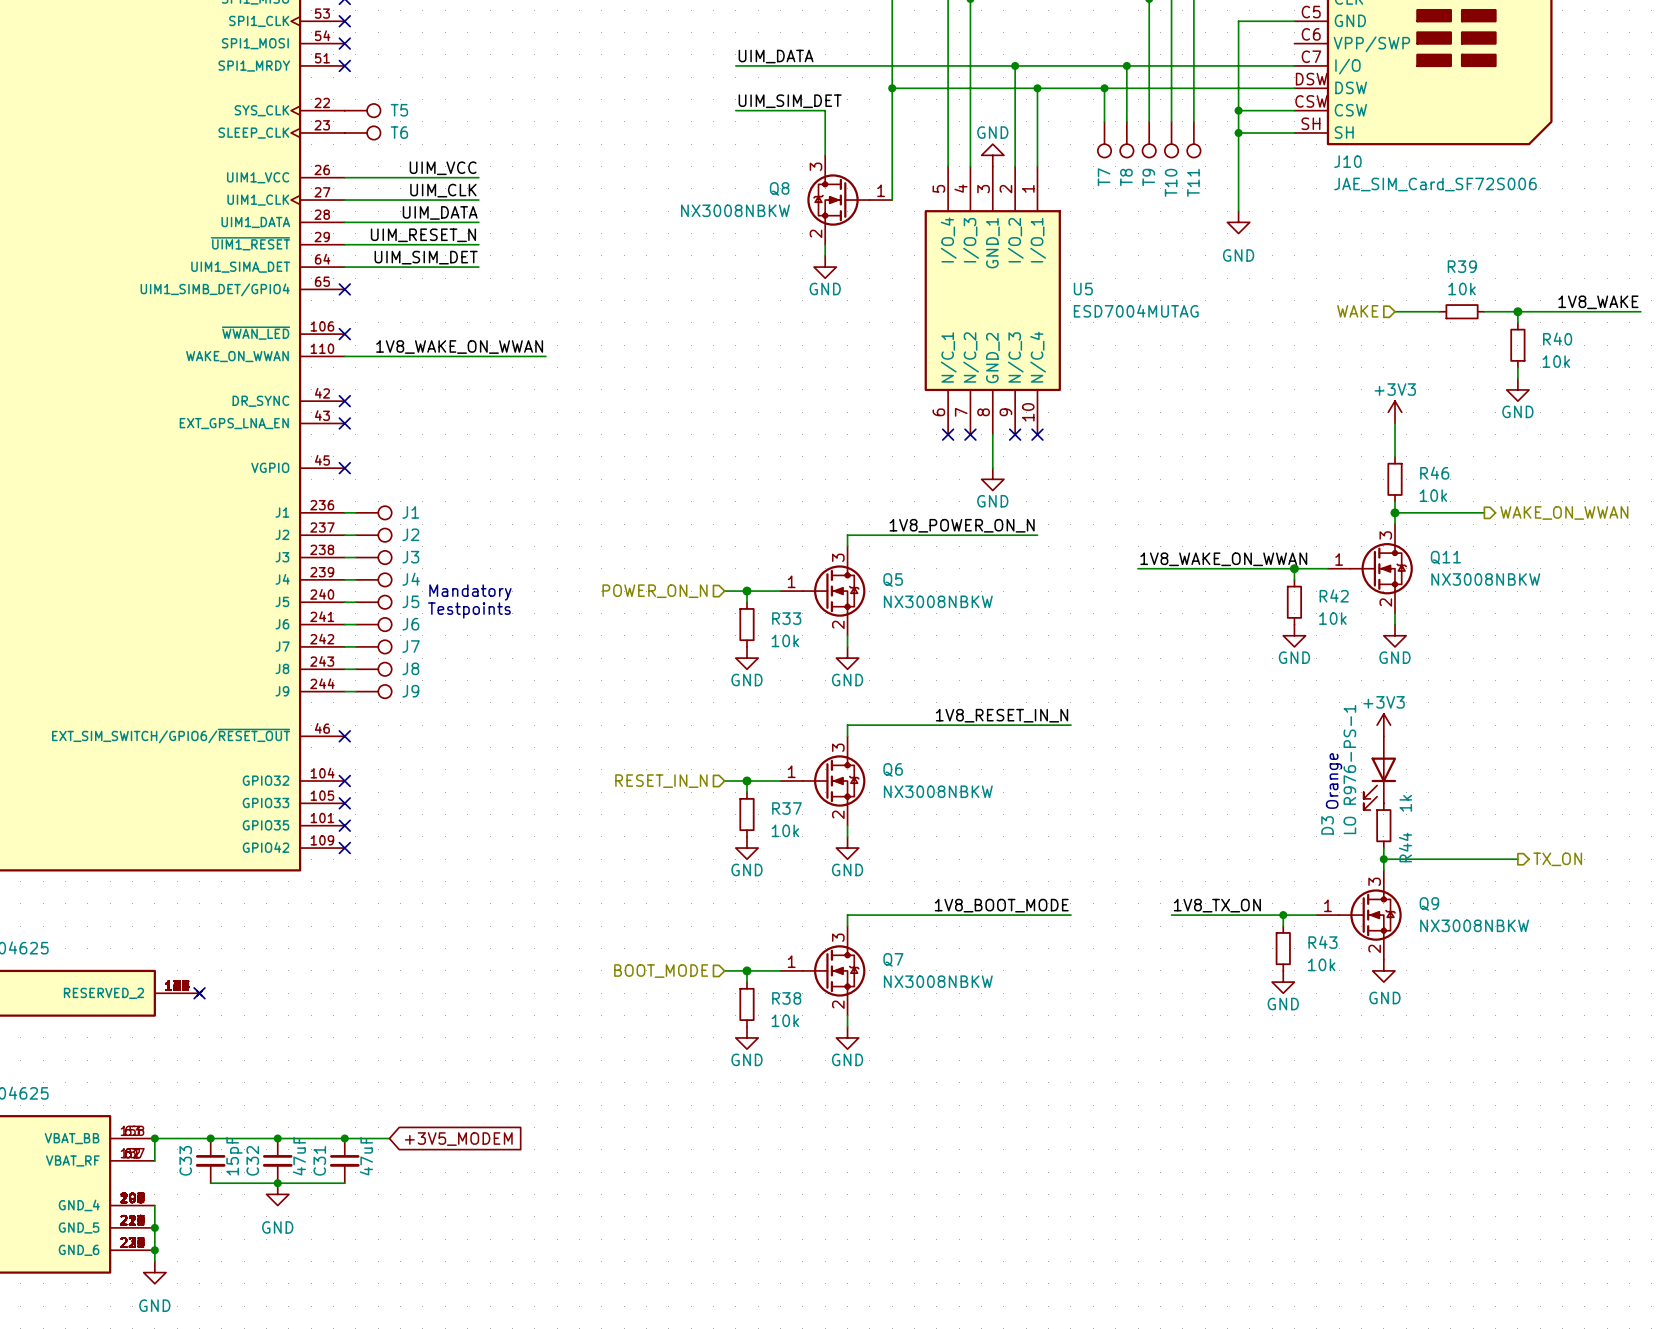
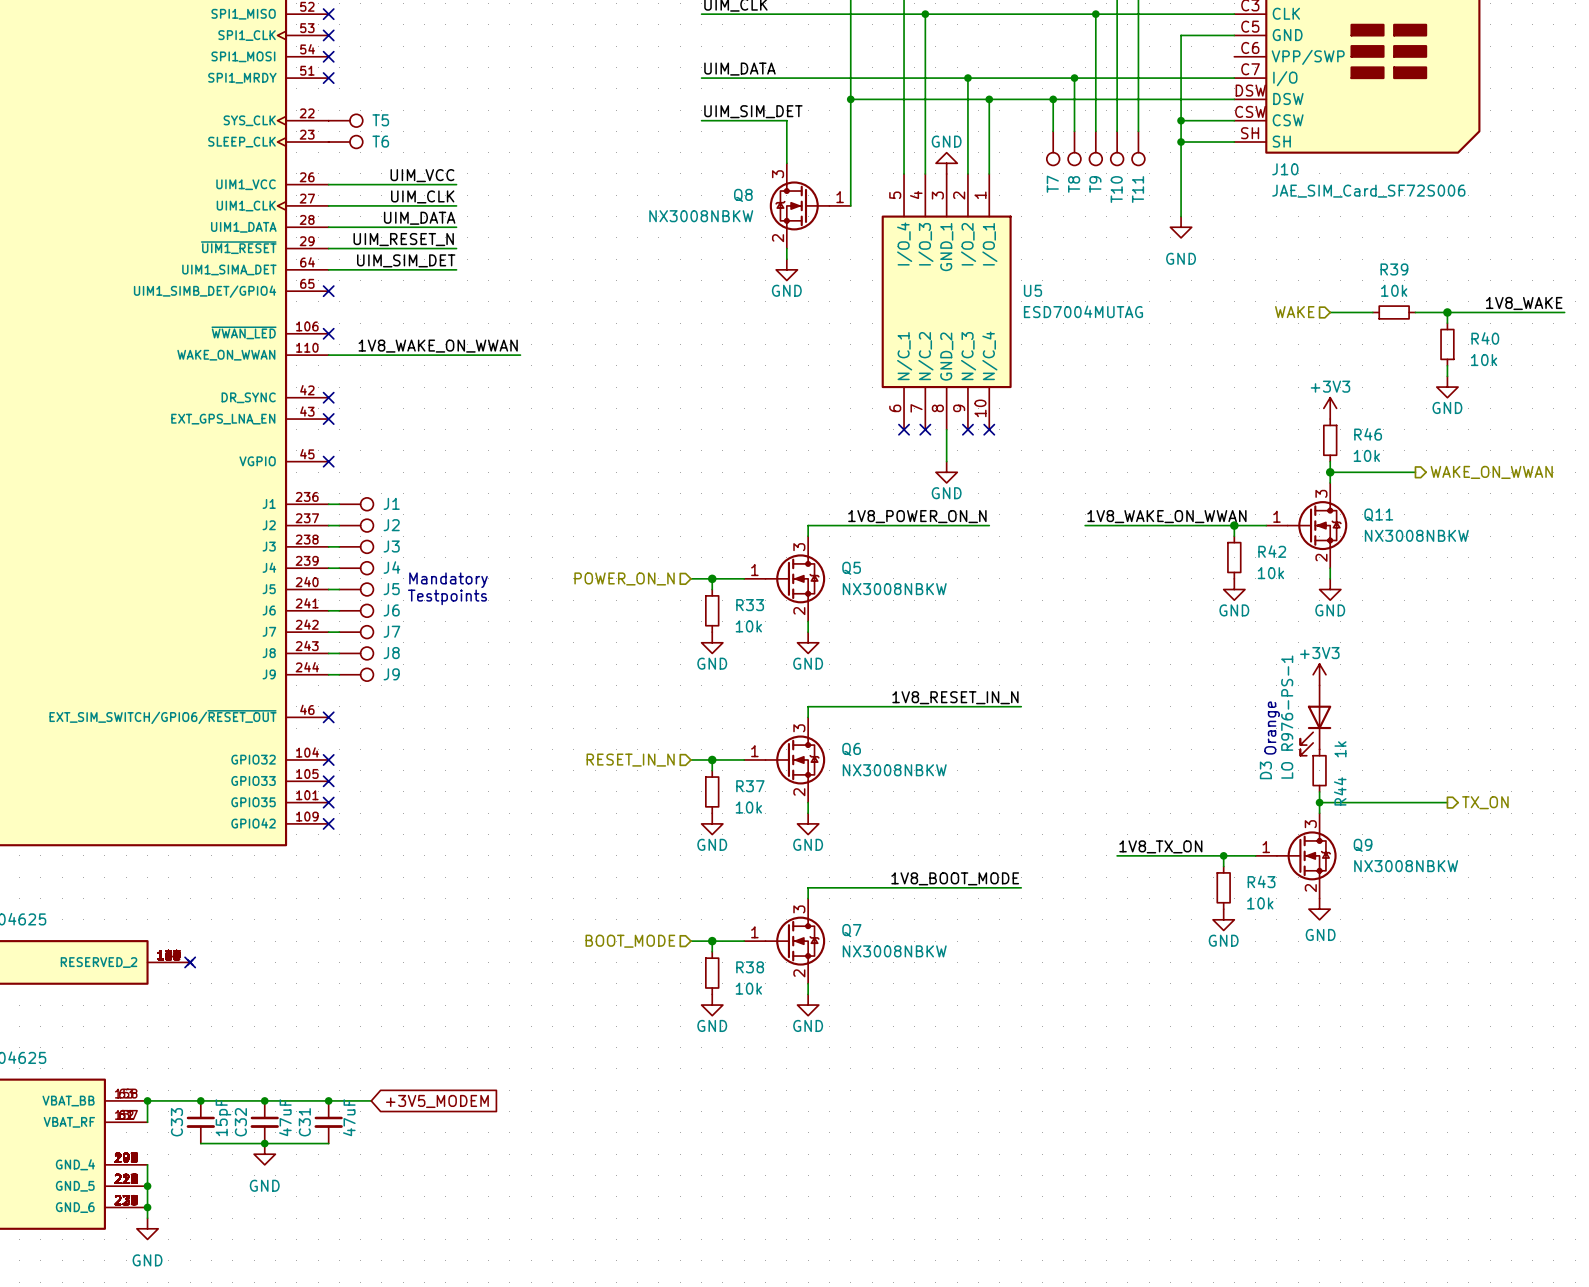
wire: (1395, 423) (1395, 456) -> none
R46 position: (1395, 479) -> (1330, 440)
wire: (1395, 512) (1484, 512) -> (1330, 472) (1415, 472)
junction position: (1395, 512) -> (1330, 472)
hierarchical label position: WAKE_ON_WWAN (1564, 512) -> WAKE_ON_WWAN (1491, 472)
label position: 1V8_WAKE_ON_WWAN (1223, 559) -> 1V8_WAKE_ON_WWAN (1166, 516)
wire: (1138, 568) (1327, 568) -> (1085, 525) (1266, 525)
wire: (1294, 568) (1294, 579) -> (1234, 525) (1234, 536)
junction position: (1294, 568) -> (1234, 525)
Q11 position: (1370, 568) -> (1306, 525)
R42 position: (1294, 602) -> (1234, 557)
power symbol position: GND (1294, 635) -> GND (1234, 589)
power symbol position: GND (1395, 635) -> GND (1330, 589)
power symbol position: +3V3 (1383, 725) -> +3V3 (1319, 674)
D3 position: (1379, 773) -> (1315, 720)
text position: Orange (1334, 781) -> Orange (1272, 728)
R44 position: (1383, 825) -> (1319, 770)
wire: (1383, 859) (1517, 859) -> (1319, 802) (1447, 802)
junction position: (1383, 859) -> (1319, 802)
hierarchical label position: TX_ON (1557, 859) -> TX_ON (1485, 802)
label position: 1V8_TX_ON (1217, 905) -> 1V8_TX_ON (1160, 846)
wire: (1171, 915) (1316, 915) -> (1117, 855) (1255, 855)
wire: (1283, 915) (1283, 926) -> (1223, 855) (1223, 866)
junction position: (1283, 915) -> (1223, 855)
Q9 position: (1359, 915) -> (1296, 855)
R43 position: (1283, 948) -> (1223, 887)
power symbol position: GND (1383, 970) -> GND (1319, 909)
power symbol position: GND (1283, 982) -> GND (1223, 919)

